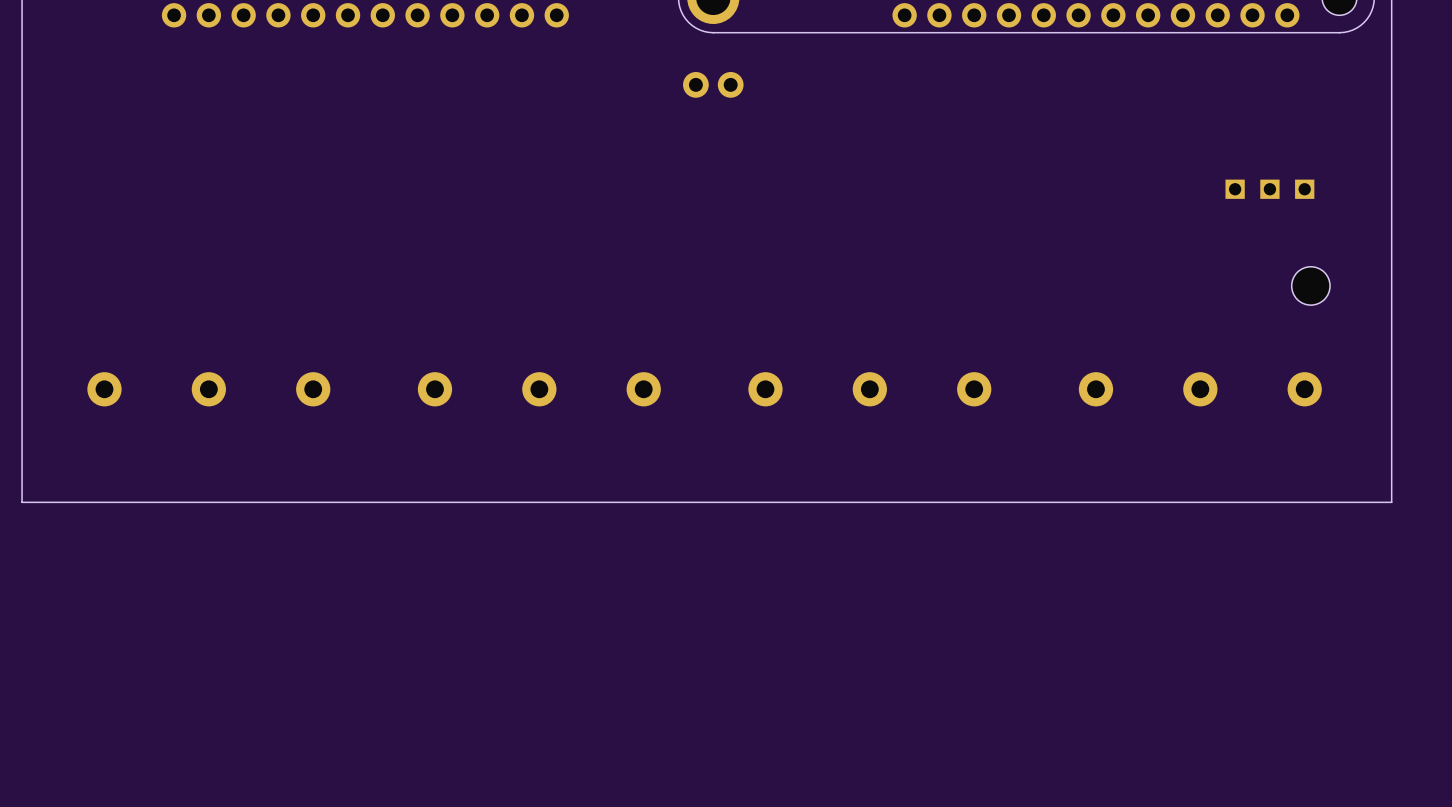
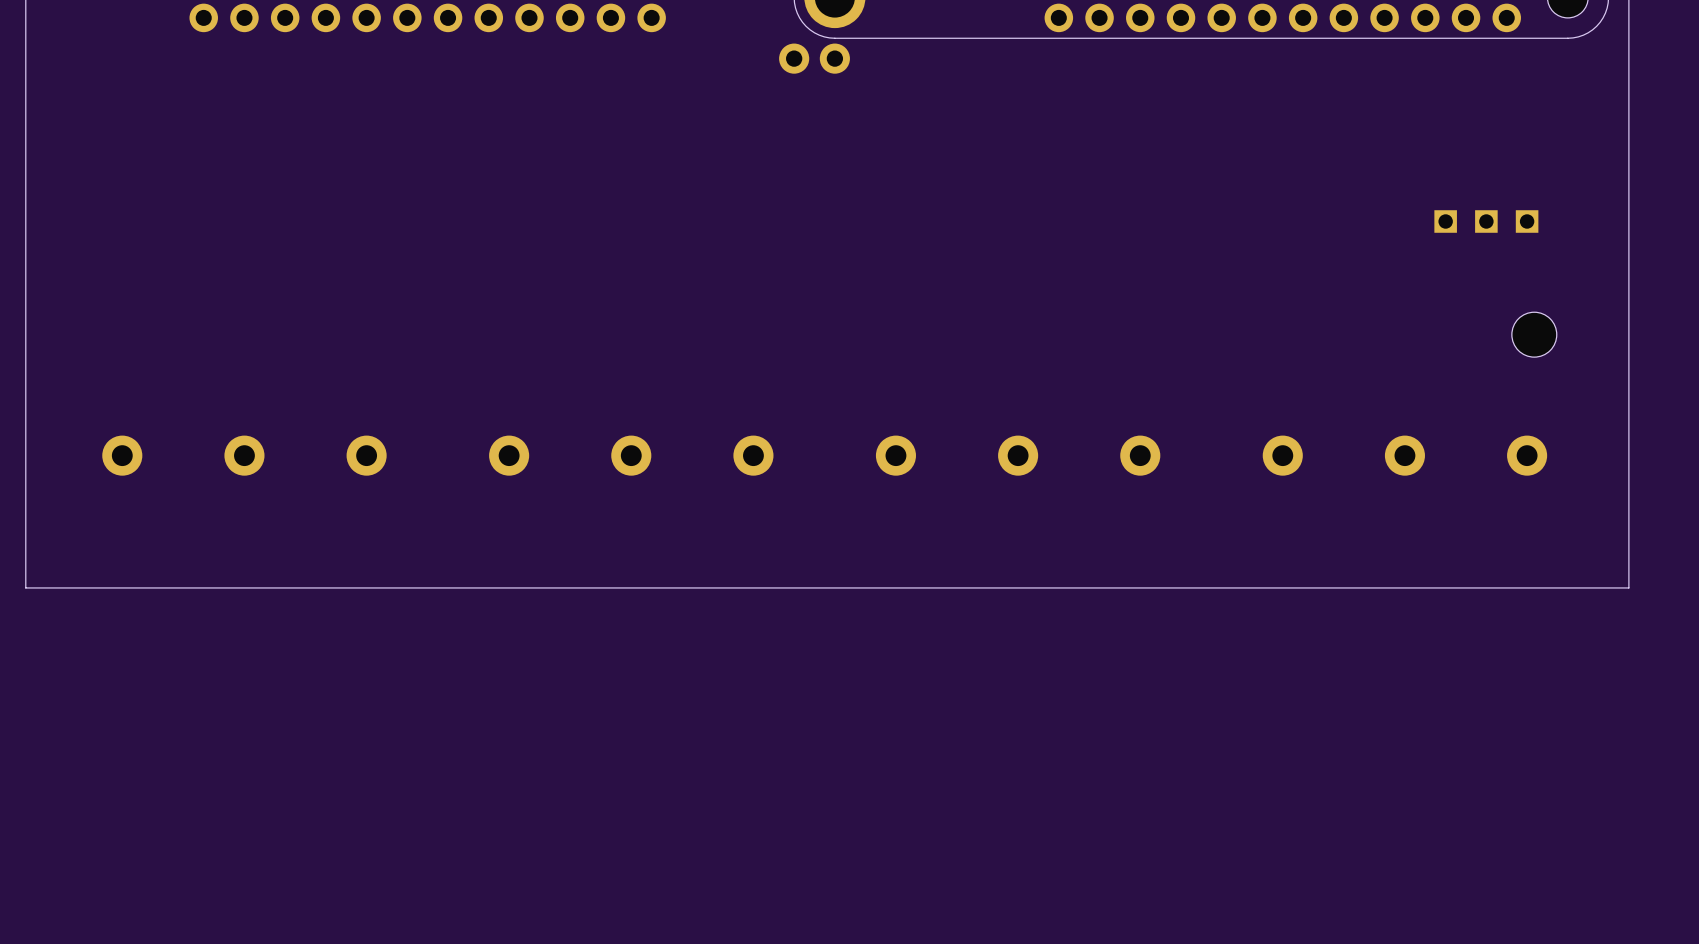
part position: (713, 84) -> (814, 58)

